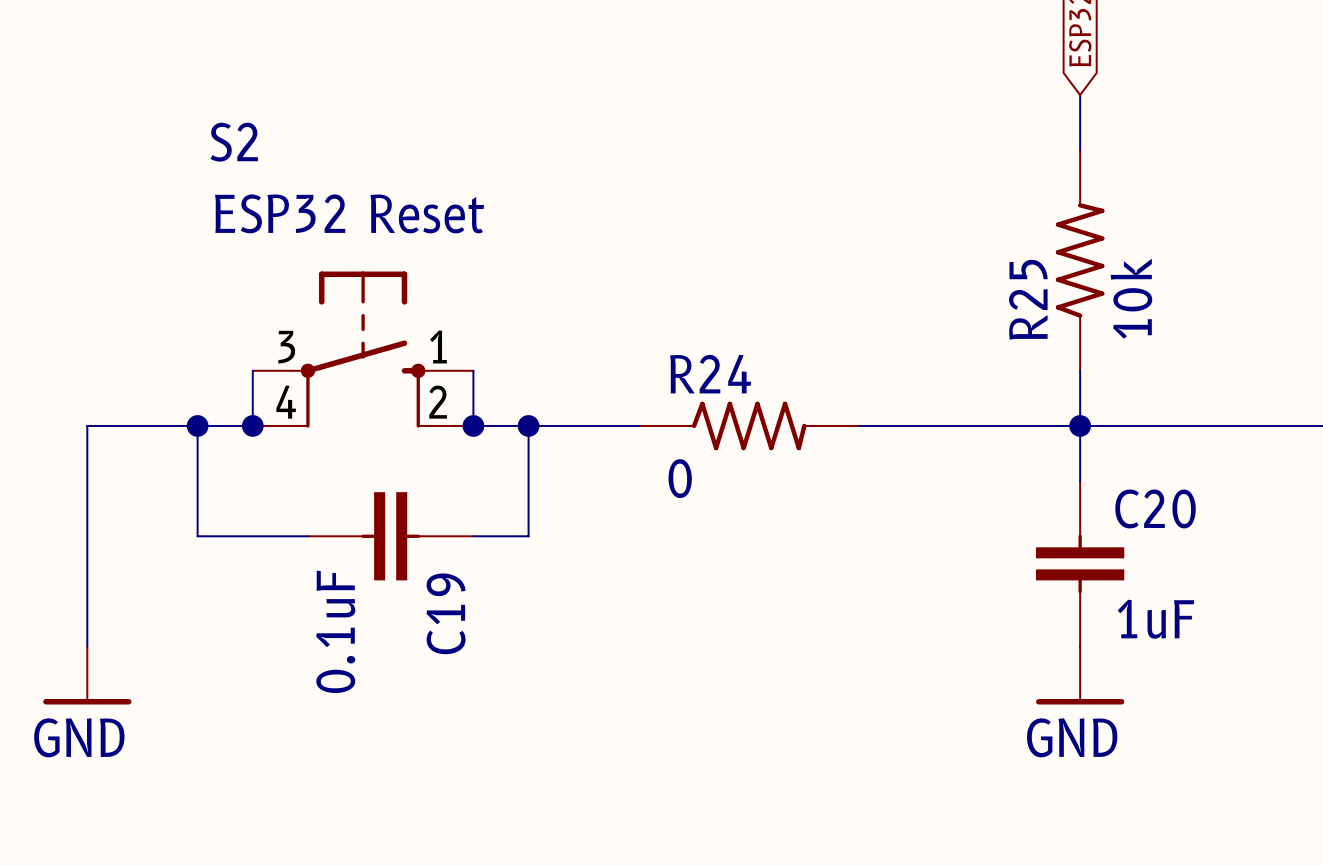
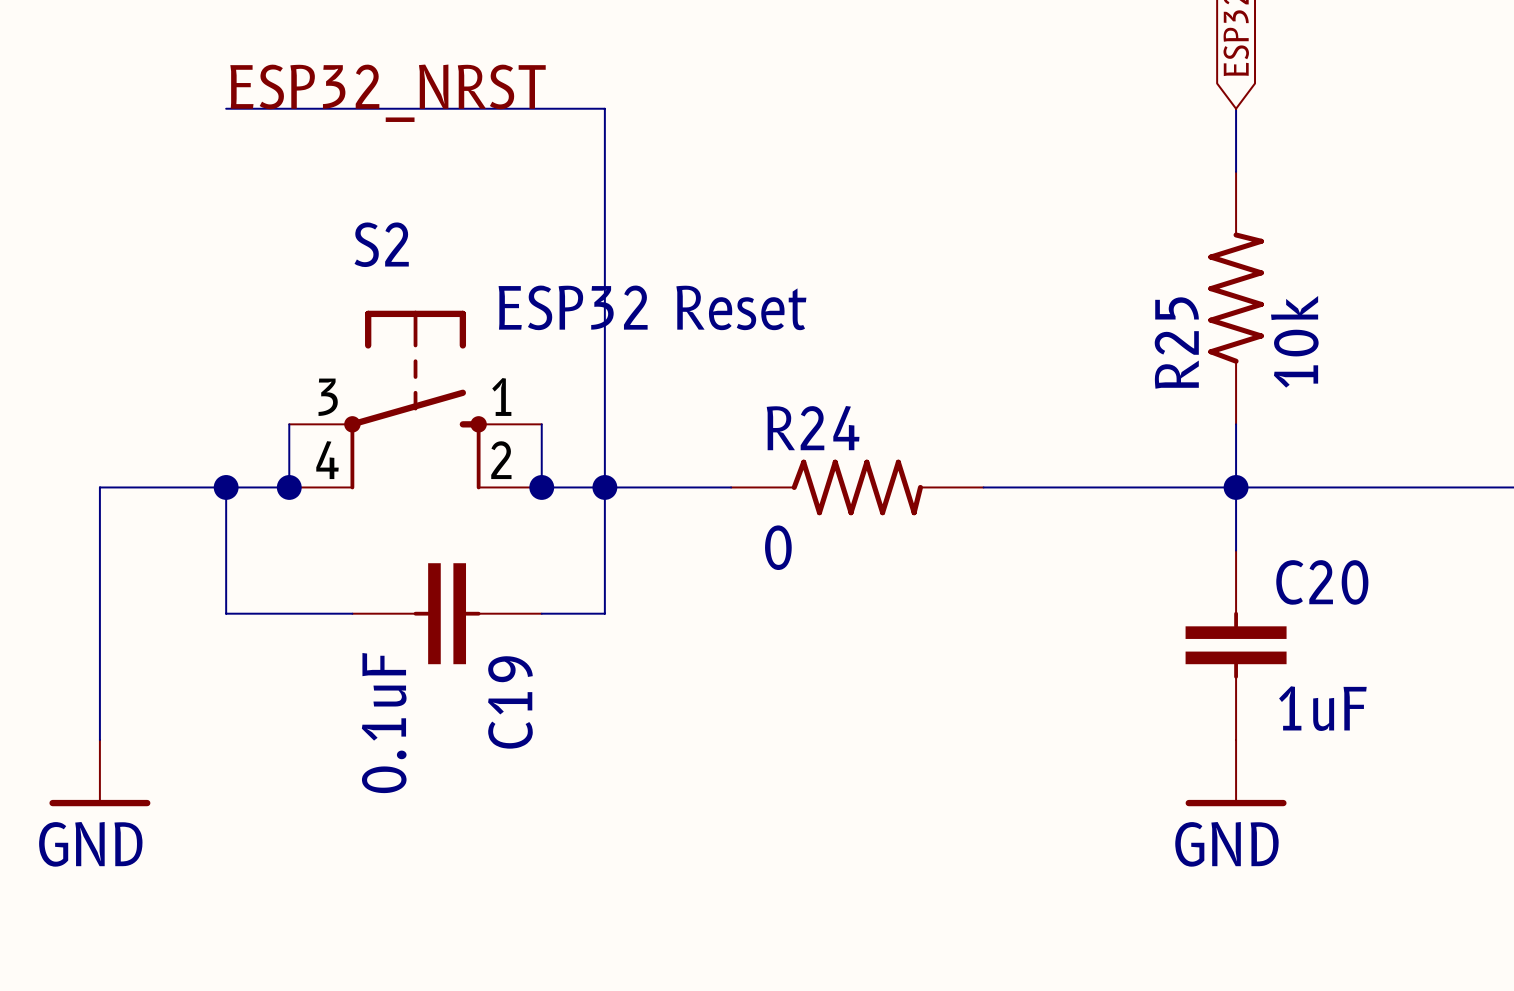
label: none -> ESP32_NRST (388, 93)
wire: none -> (226, 108) (604, 108) (604, 487)
S2 name position: S2 (234, 142) -> S2 (381, 244)
S2 value position: ESP32 Reset (349, 213) -> ESP32 Reset (652, 307)

